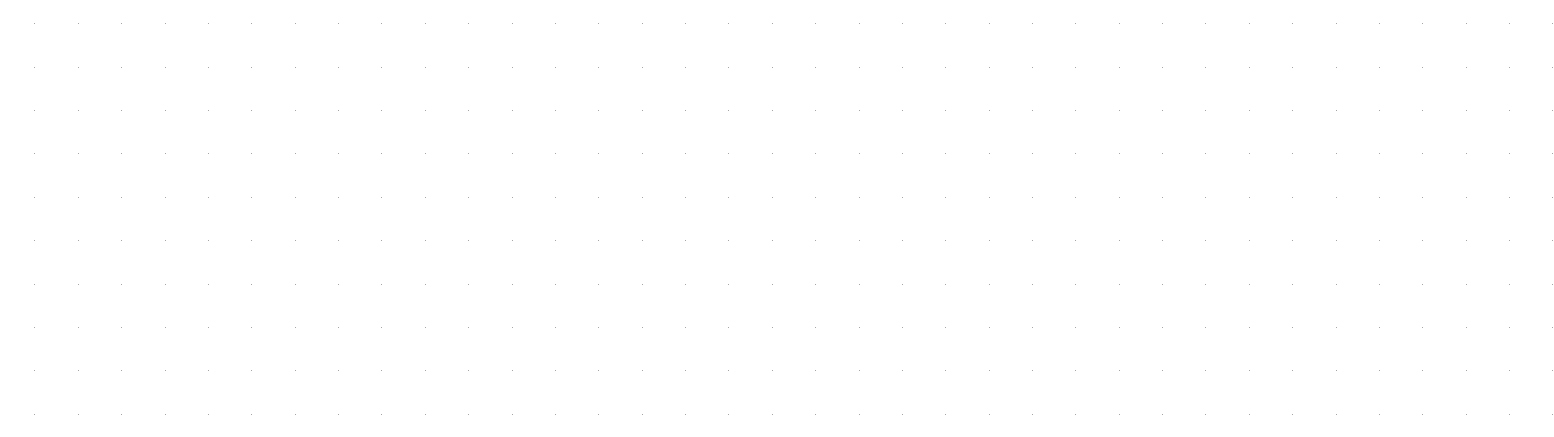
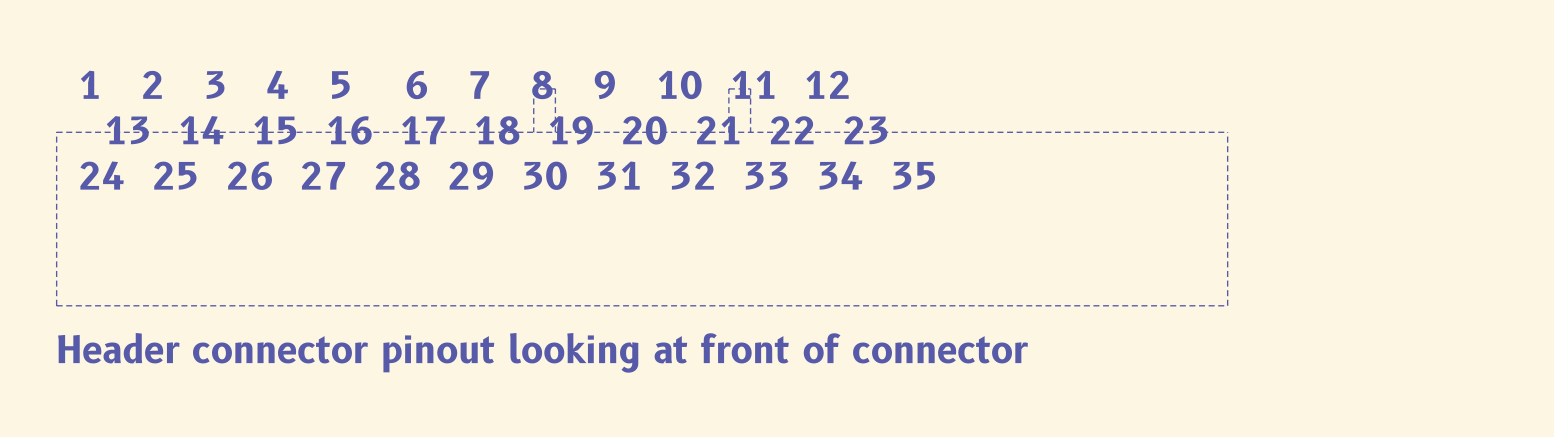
text: none -> 1 2 3 4 5 6 7 8 9 10 11 12 (464, 84)
text: none -> 13 14 15 16 17 18 19 20 21 22 23 (497, 130)
line: none -> (56, 132) (1227, 132) (1227, 305) (56, 305) (56, 132)
line: none -> (533, 132) (533, 88) (555, 88) (555, 132)
line: none -> (728, 132) (728, 88) (750, 88) (750, 132)
text: none -> 24 25 26 27 28 29 30 31 32 33 34 35 (507, 175)
text: none -> Header connector pinout looking at front of connector (542, 352)

